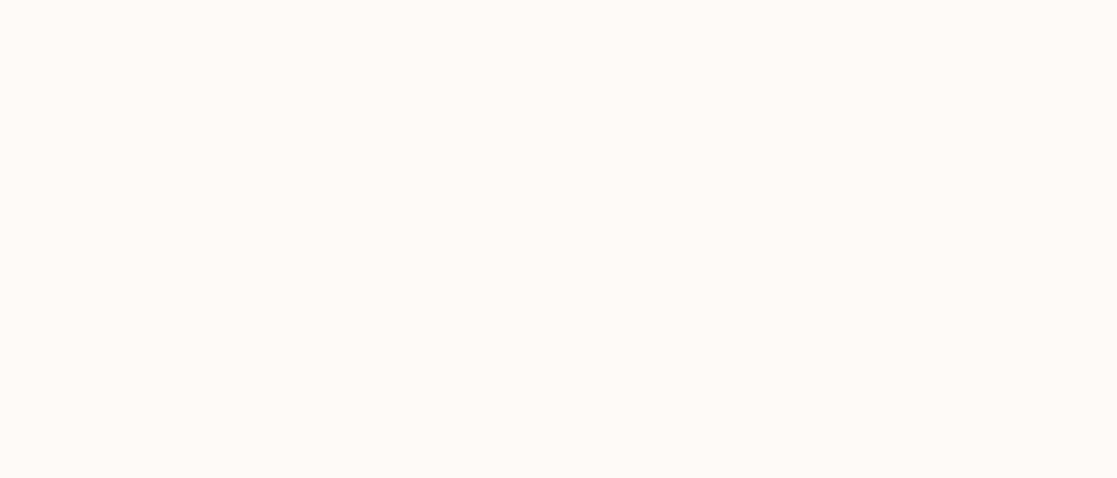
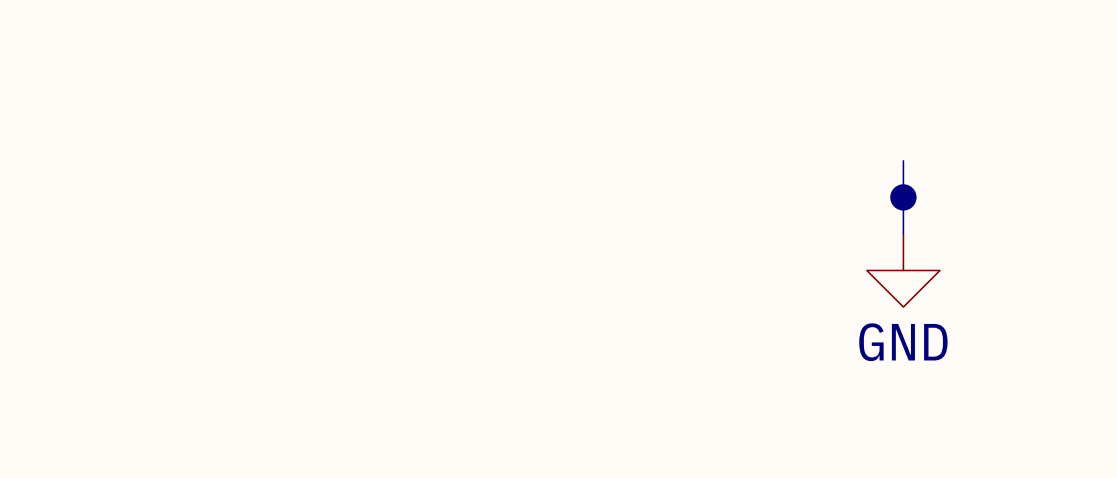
wire: none -> (903, 160) (903, 233)
junction: none -> (903, 197)
power symbol: none -> GND (903, 270)

